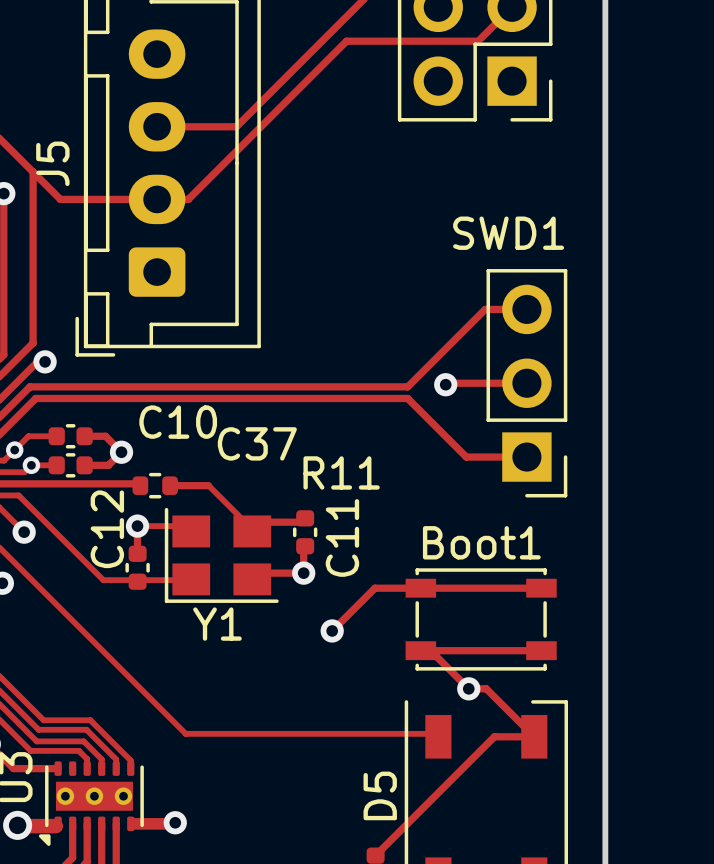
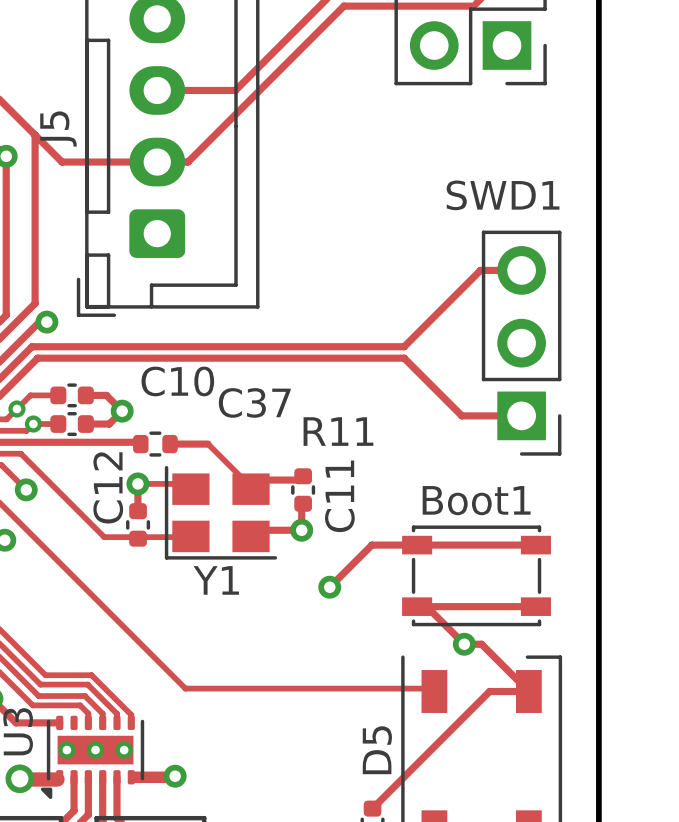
track: (526, 383) (445, 384) -> none
via: (445, 384) -> none

